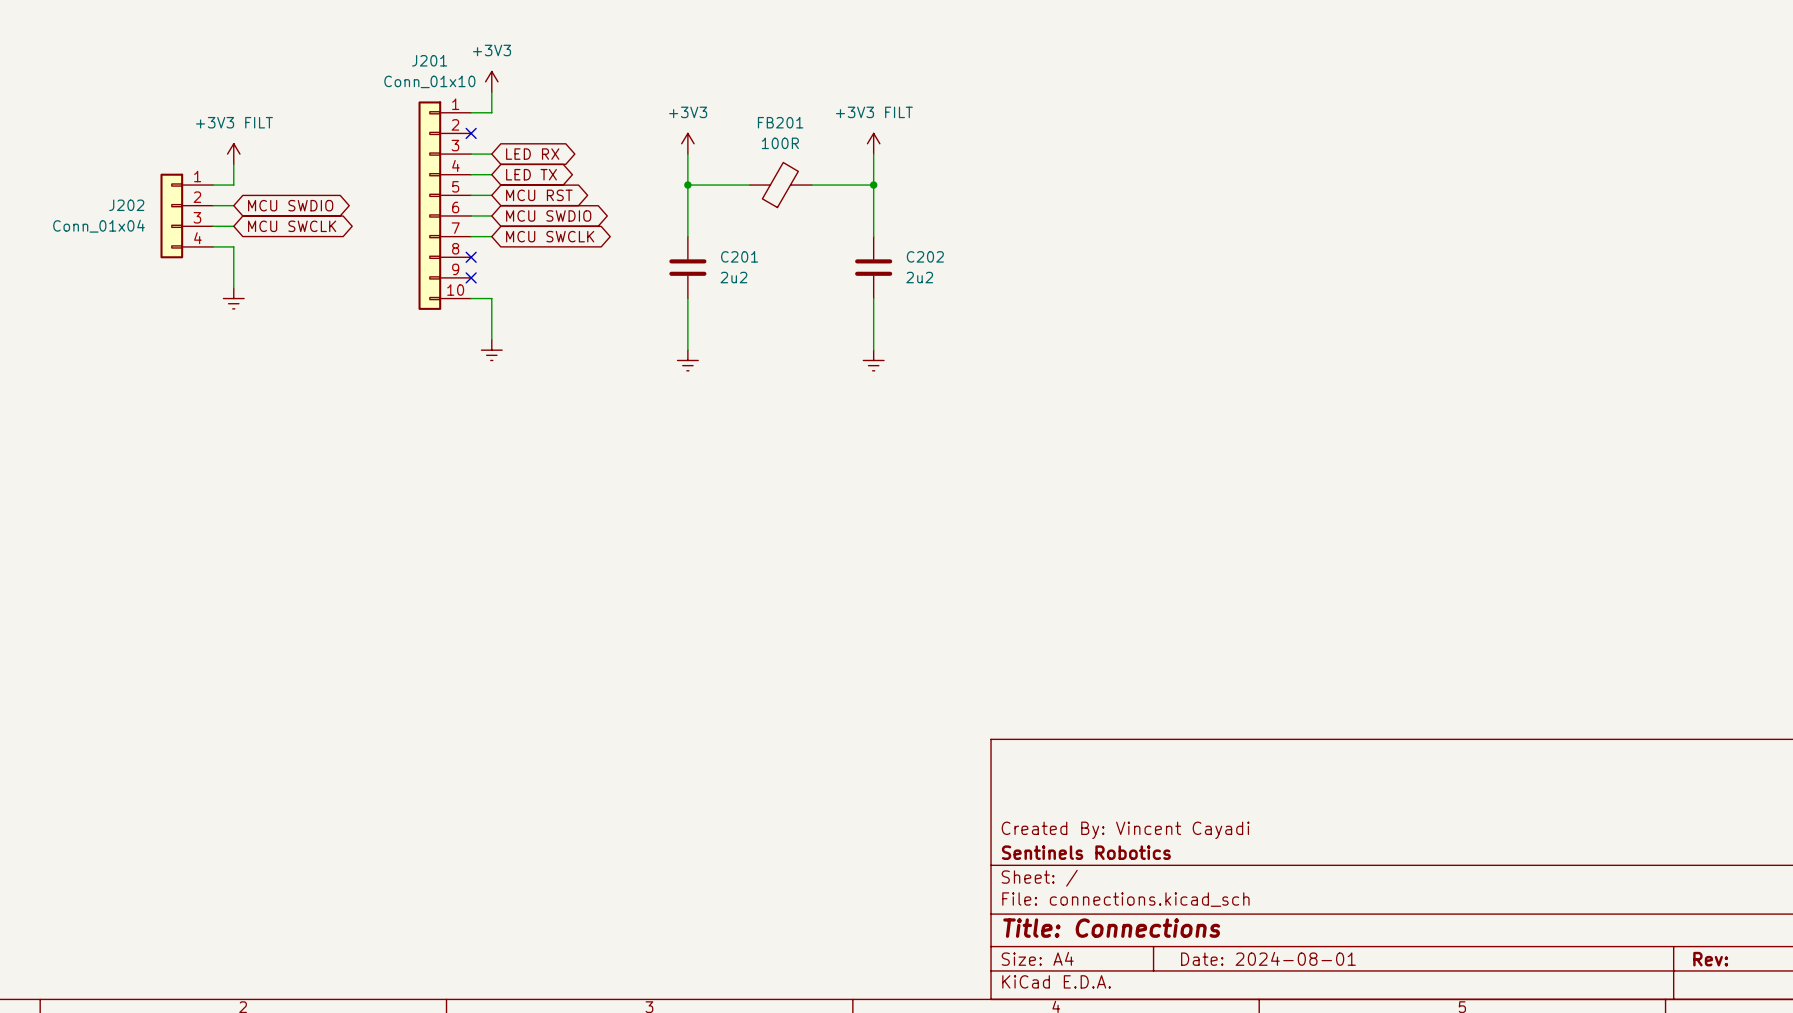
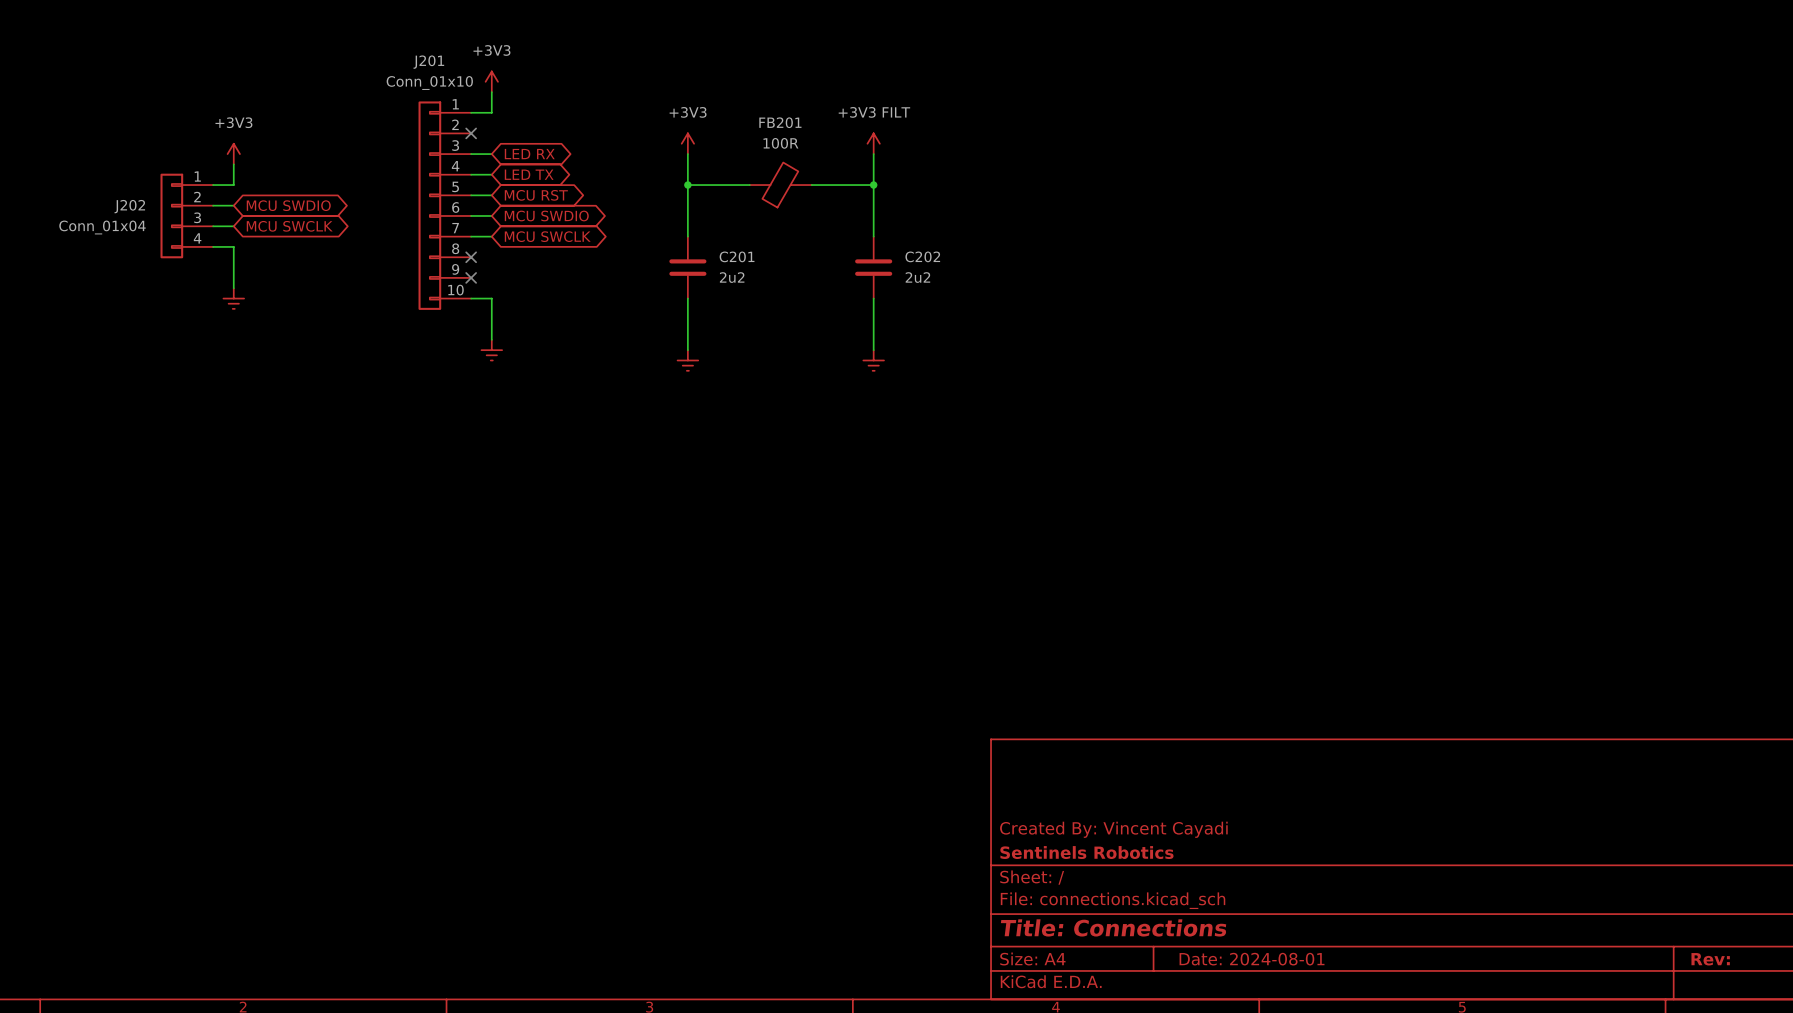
power symbol: +3V3 FILT (233, 154) -> +3V3 (233, 154)

